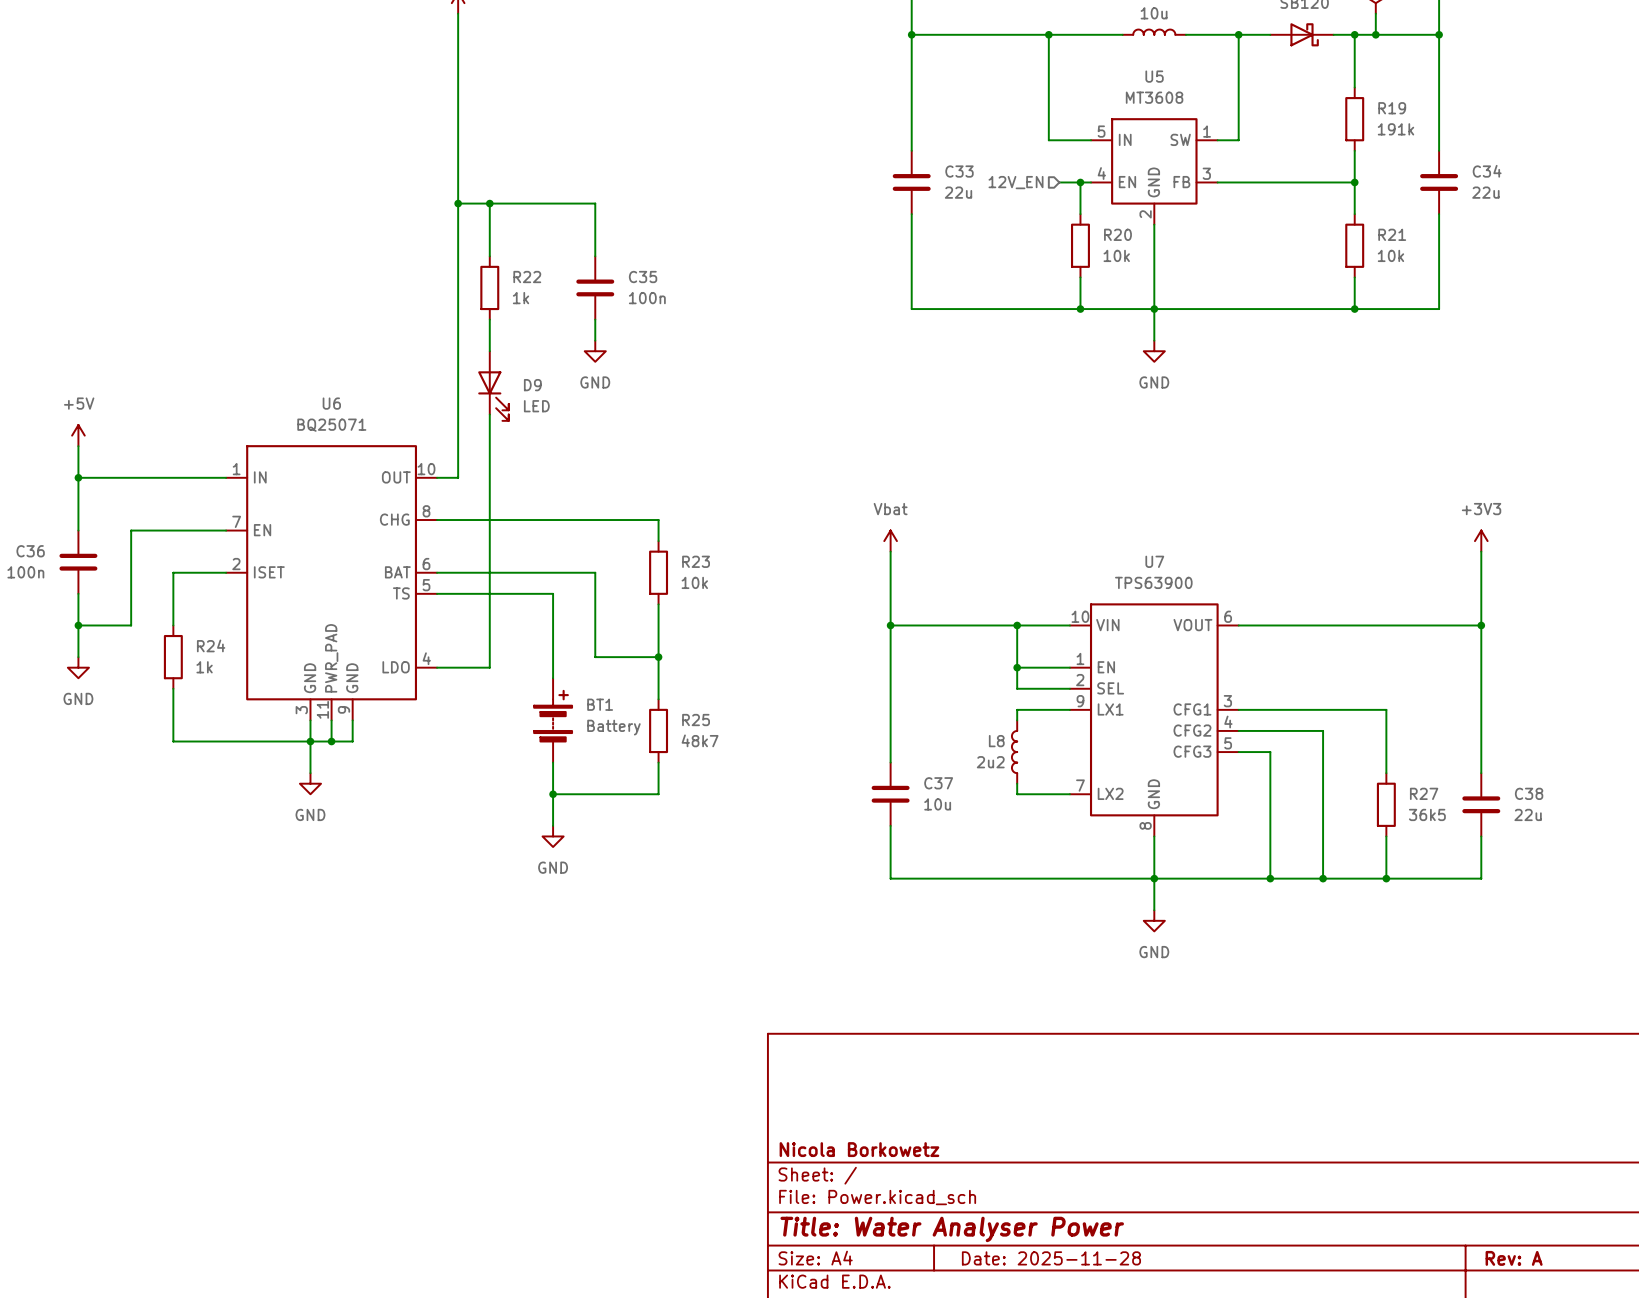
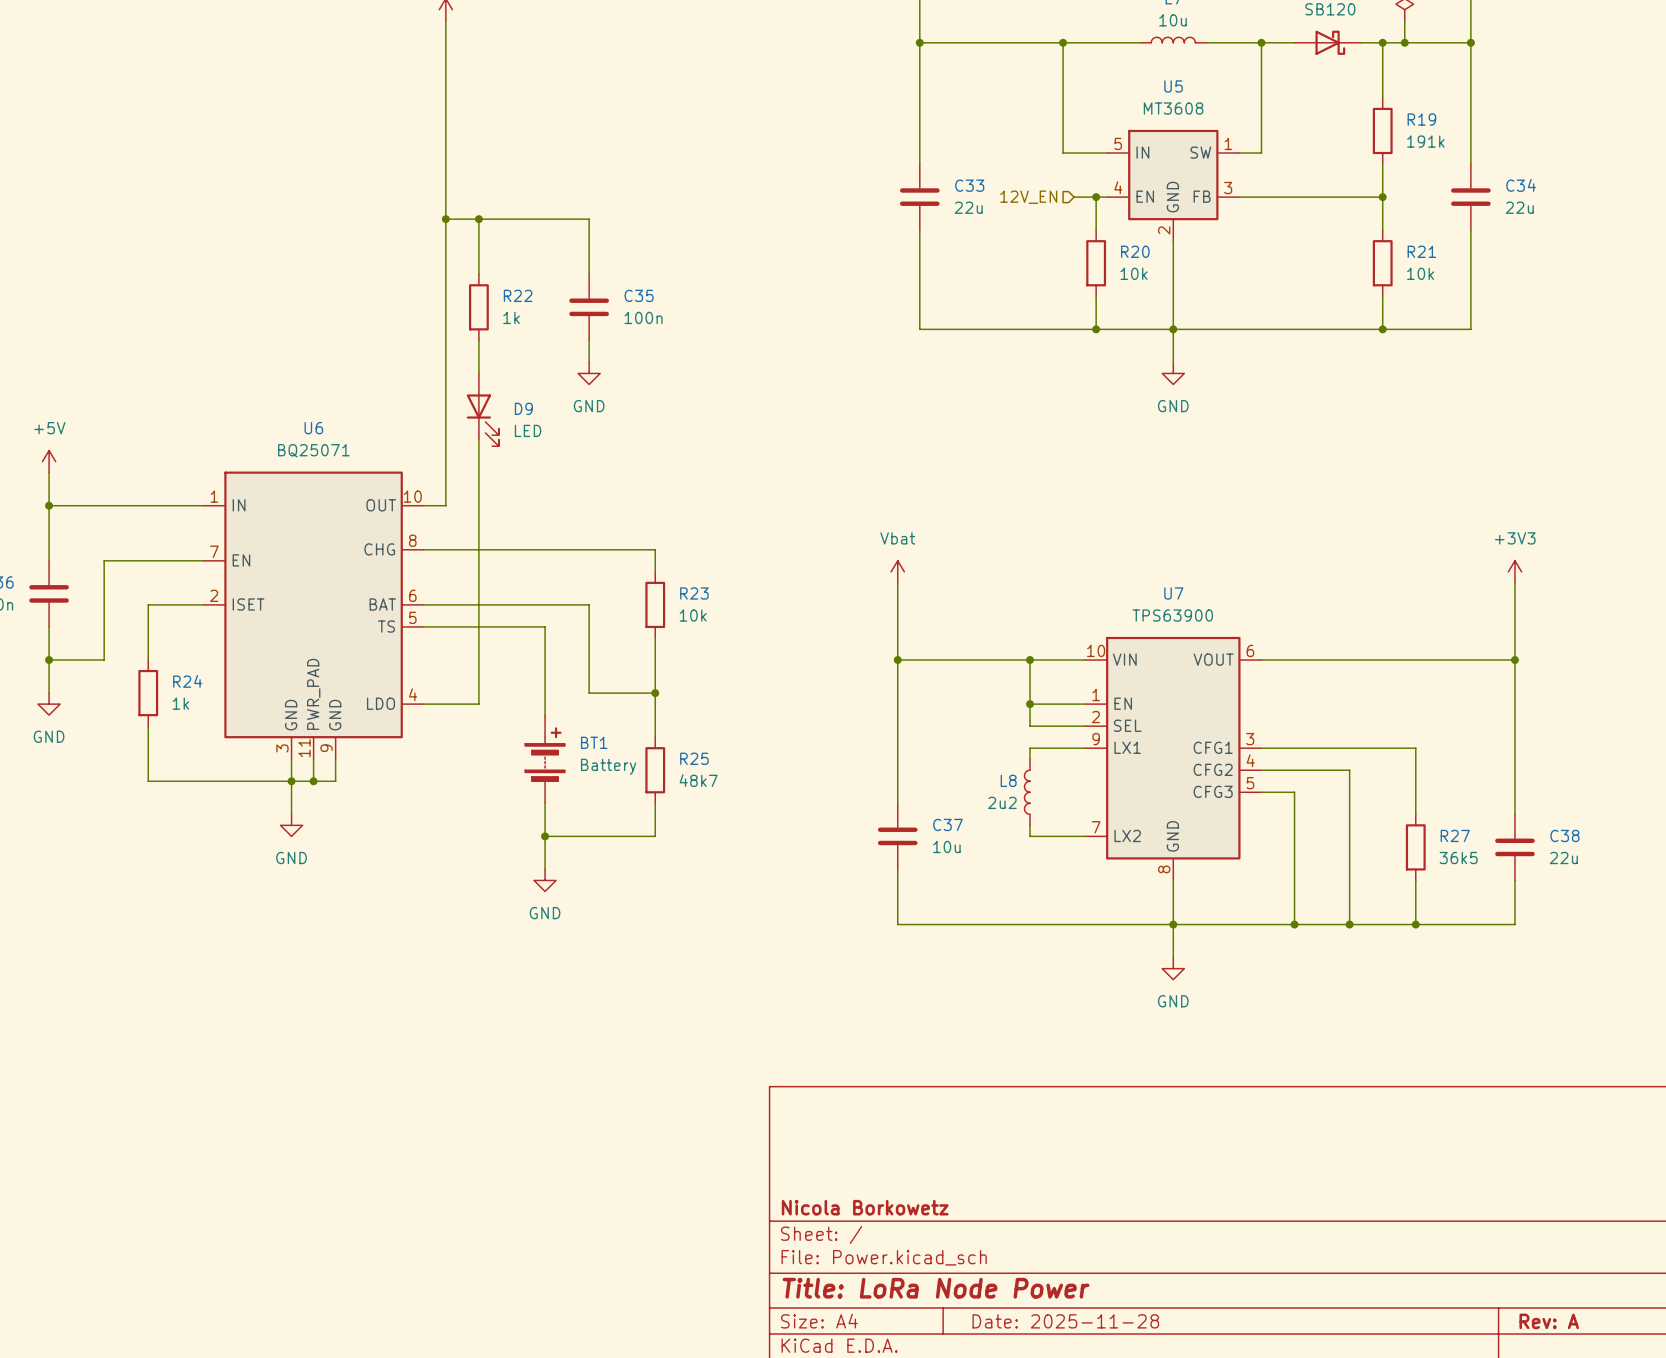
title block: Title: Water Analyser Power (952, 1229) -> Title: LoRa Node Power (936, 1288)

